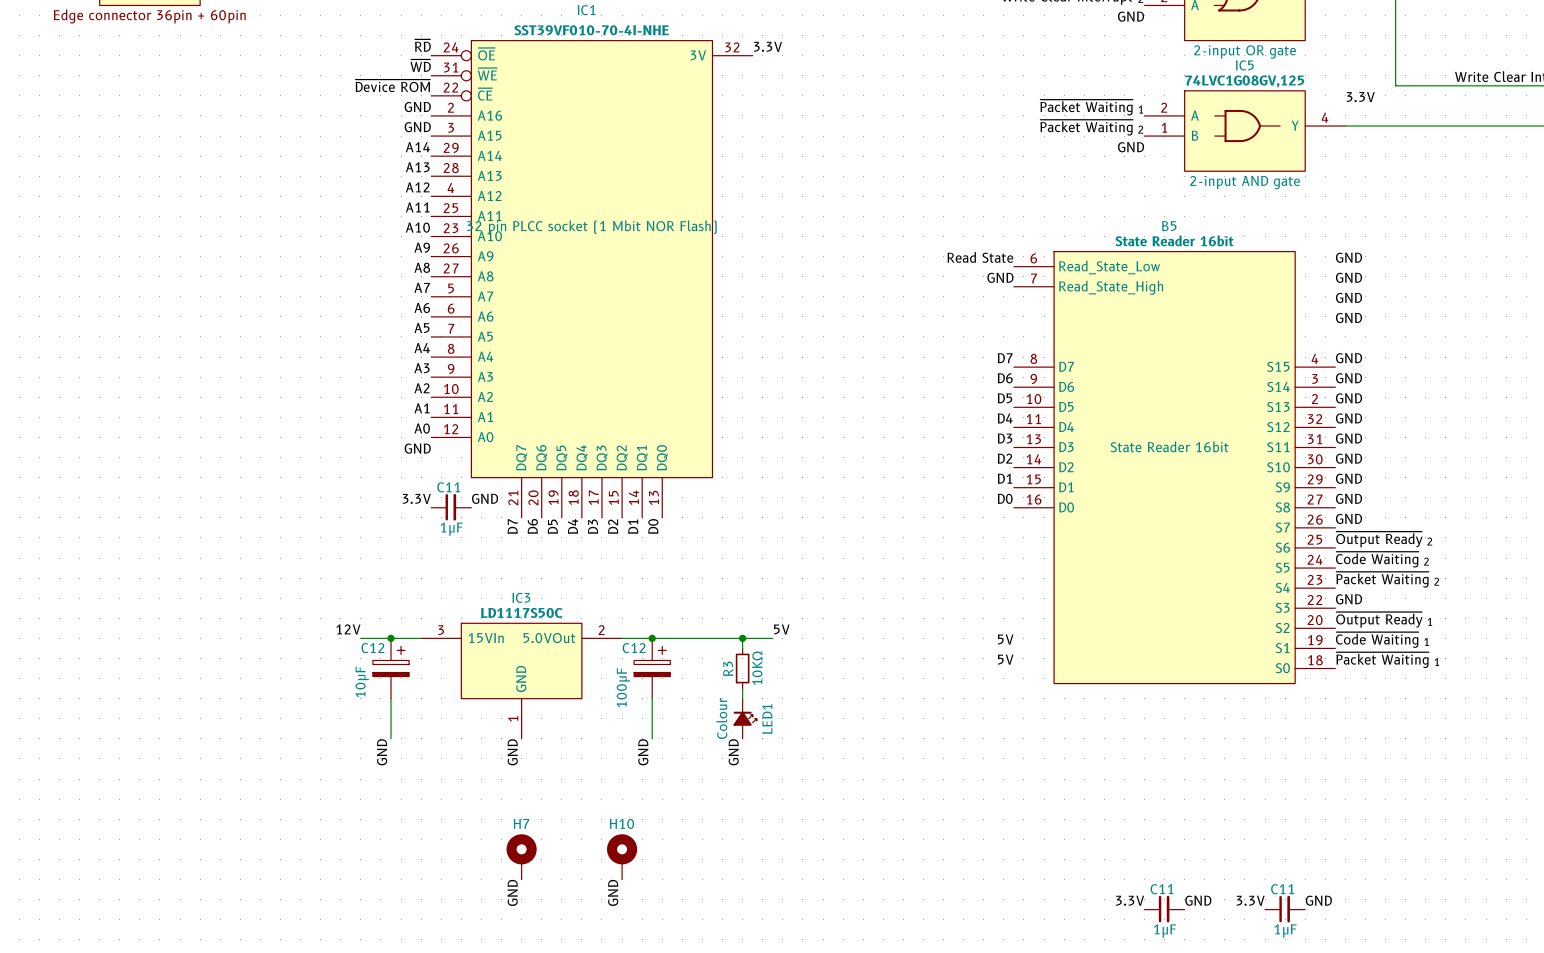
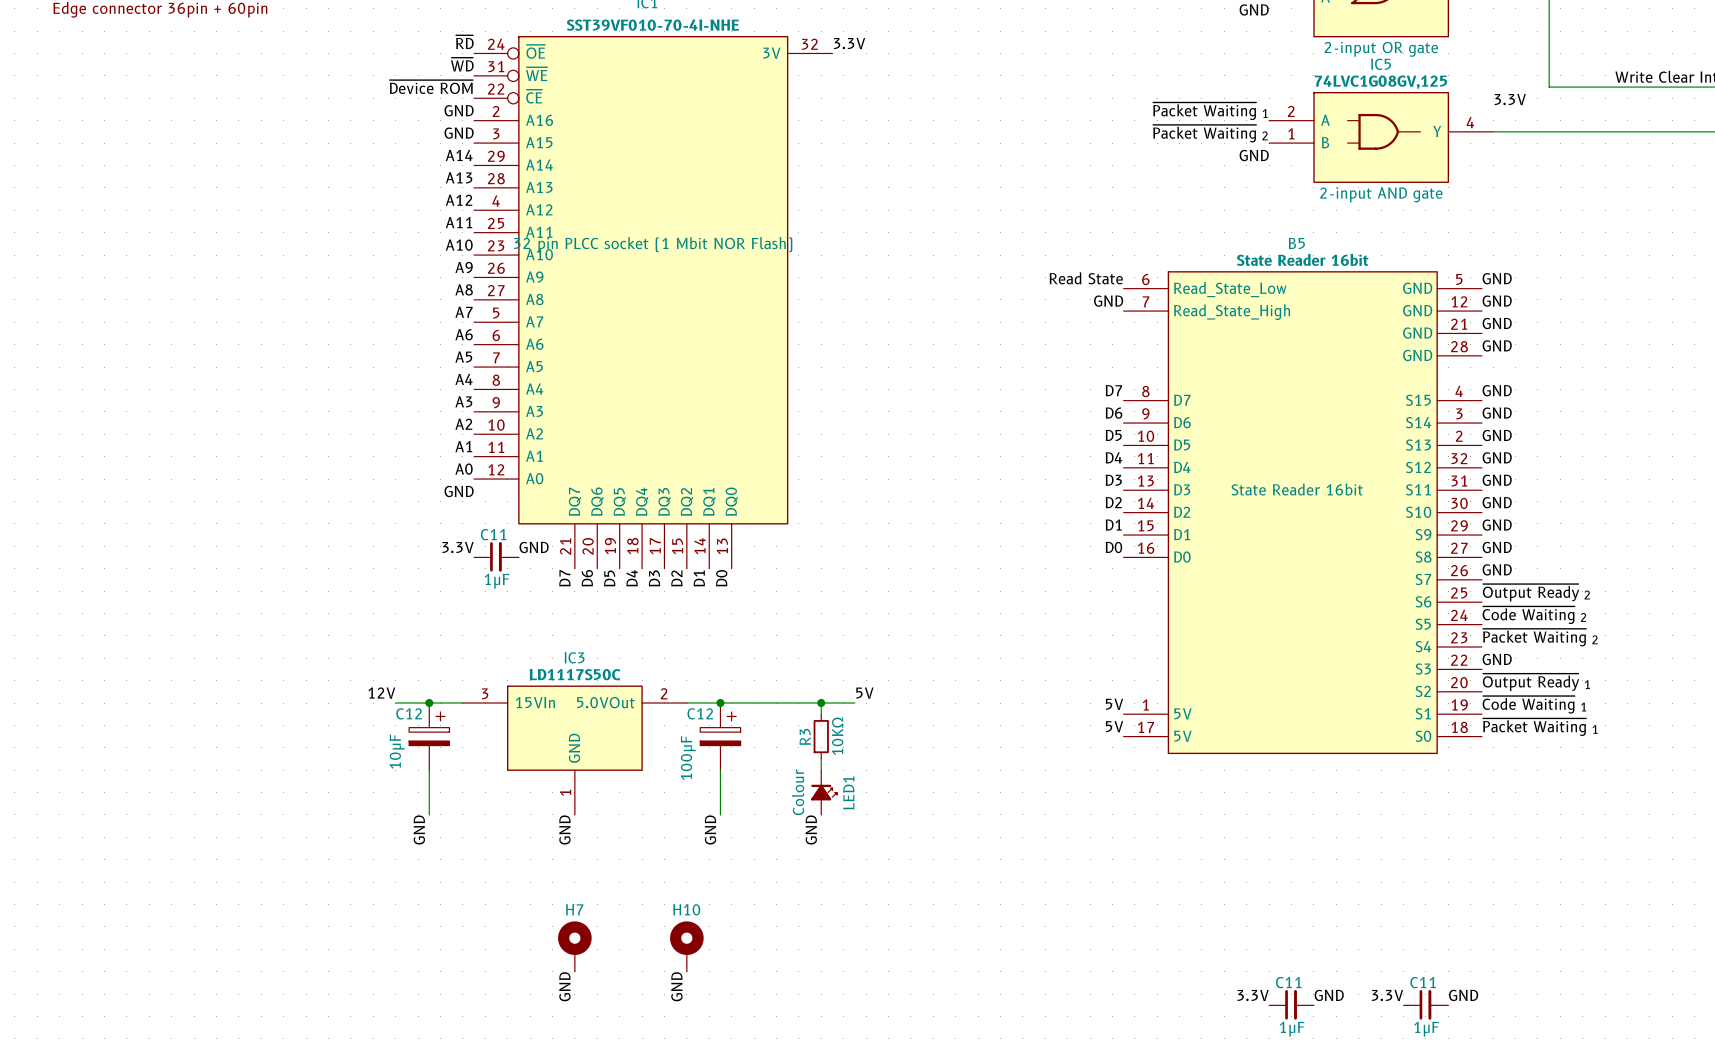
B5 symbol: [1013, 250, 1336, 685] -> [1123, 271, 1482, 755]

